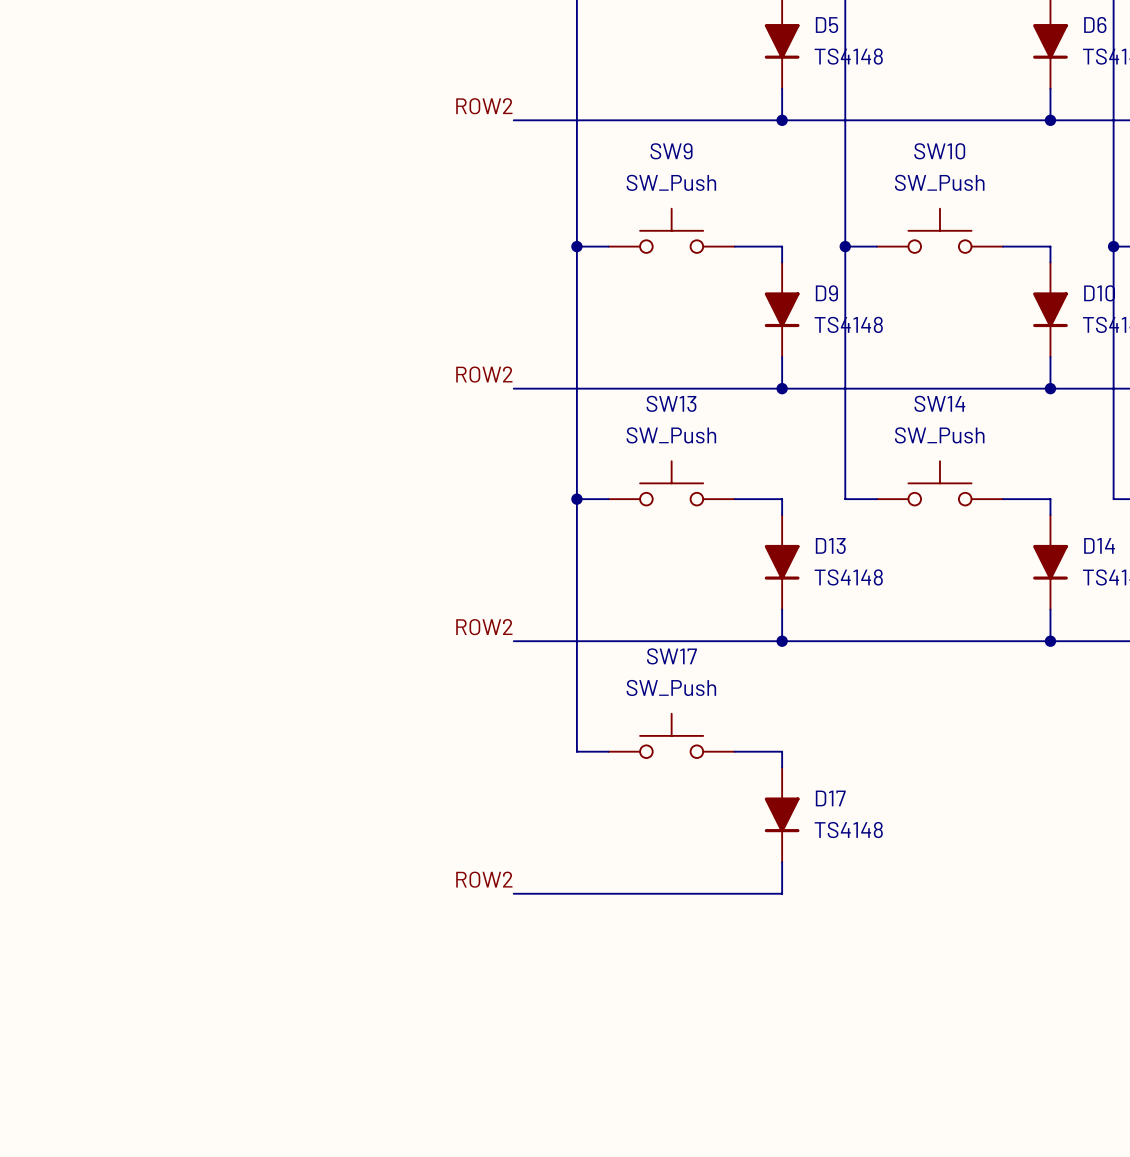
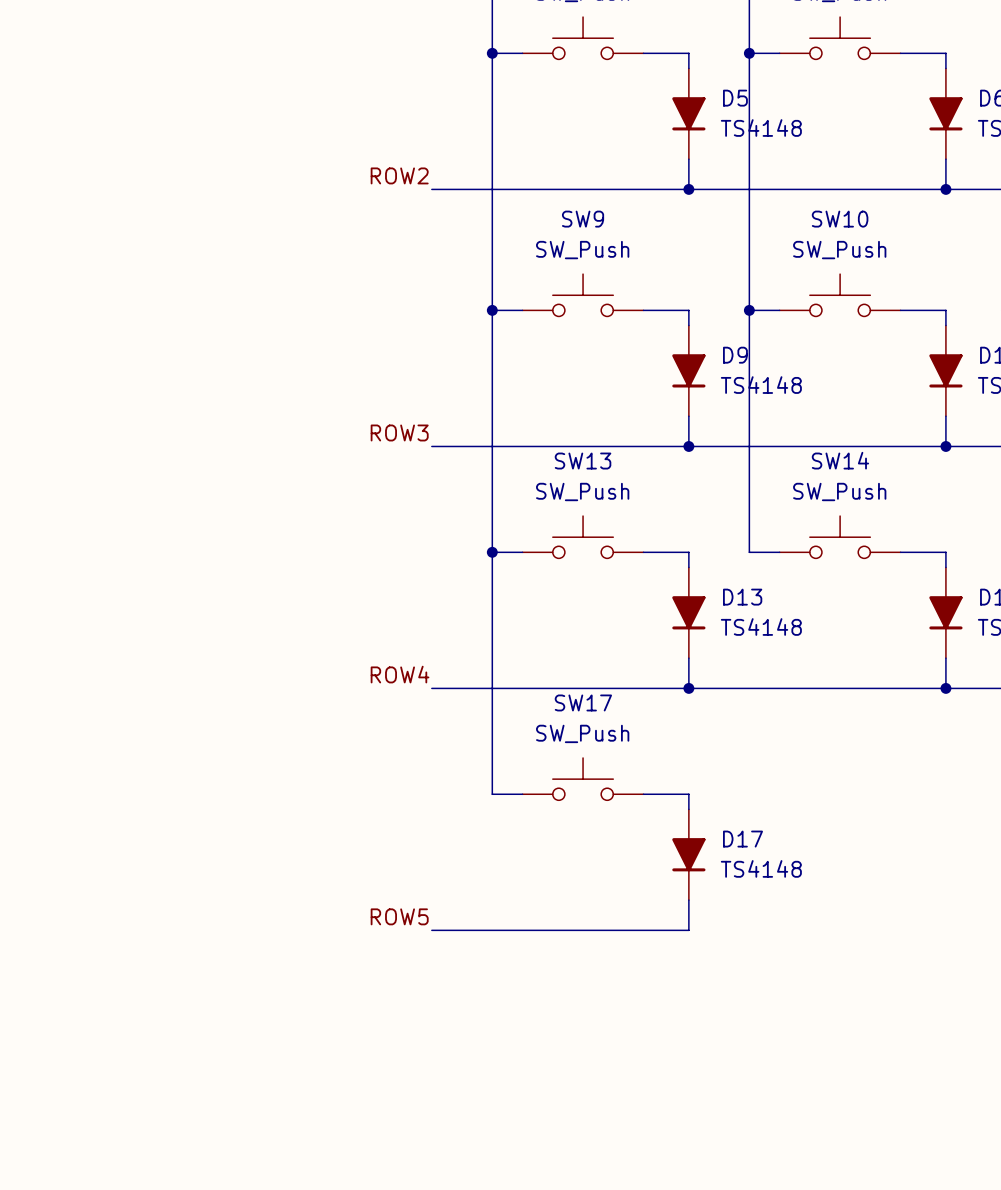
label: ROW2 (484, 374) -> ROW3 (399, 432)
label: ROW2 (484, 627) -> ROW4 (400, 674)
label: ROW2 (484, 879) -> ROW5 (399, 916)

